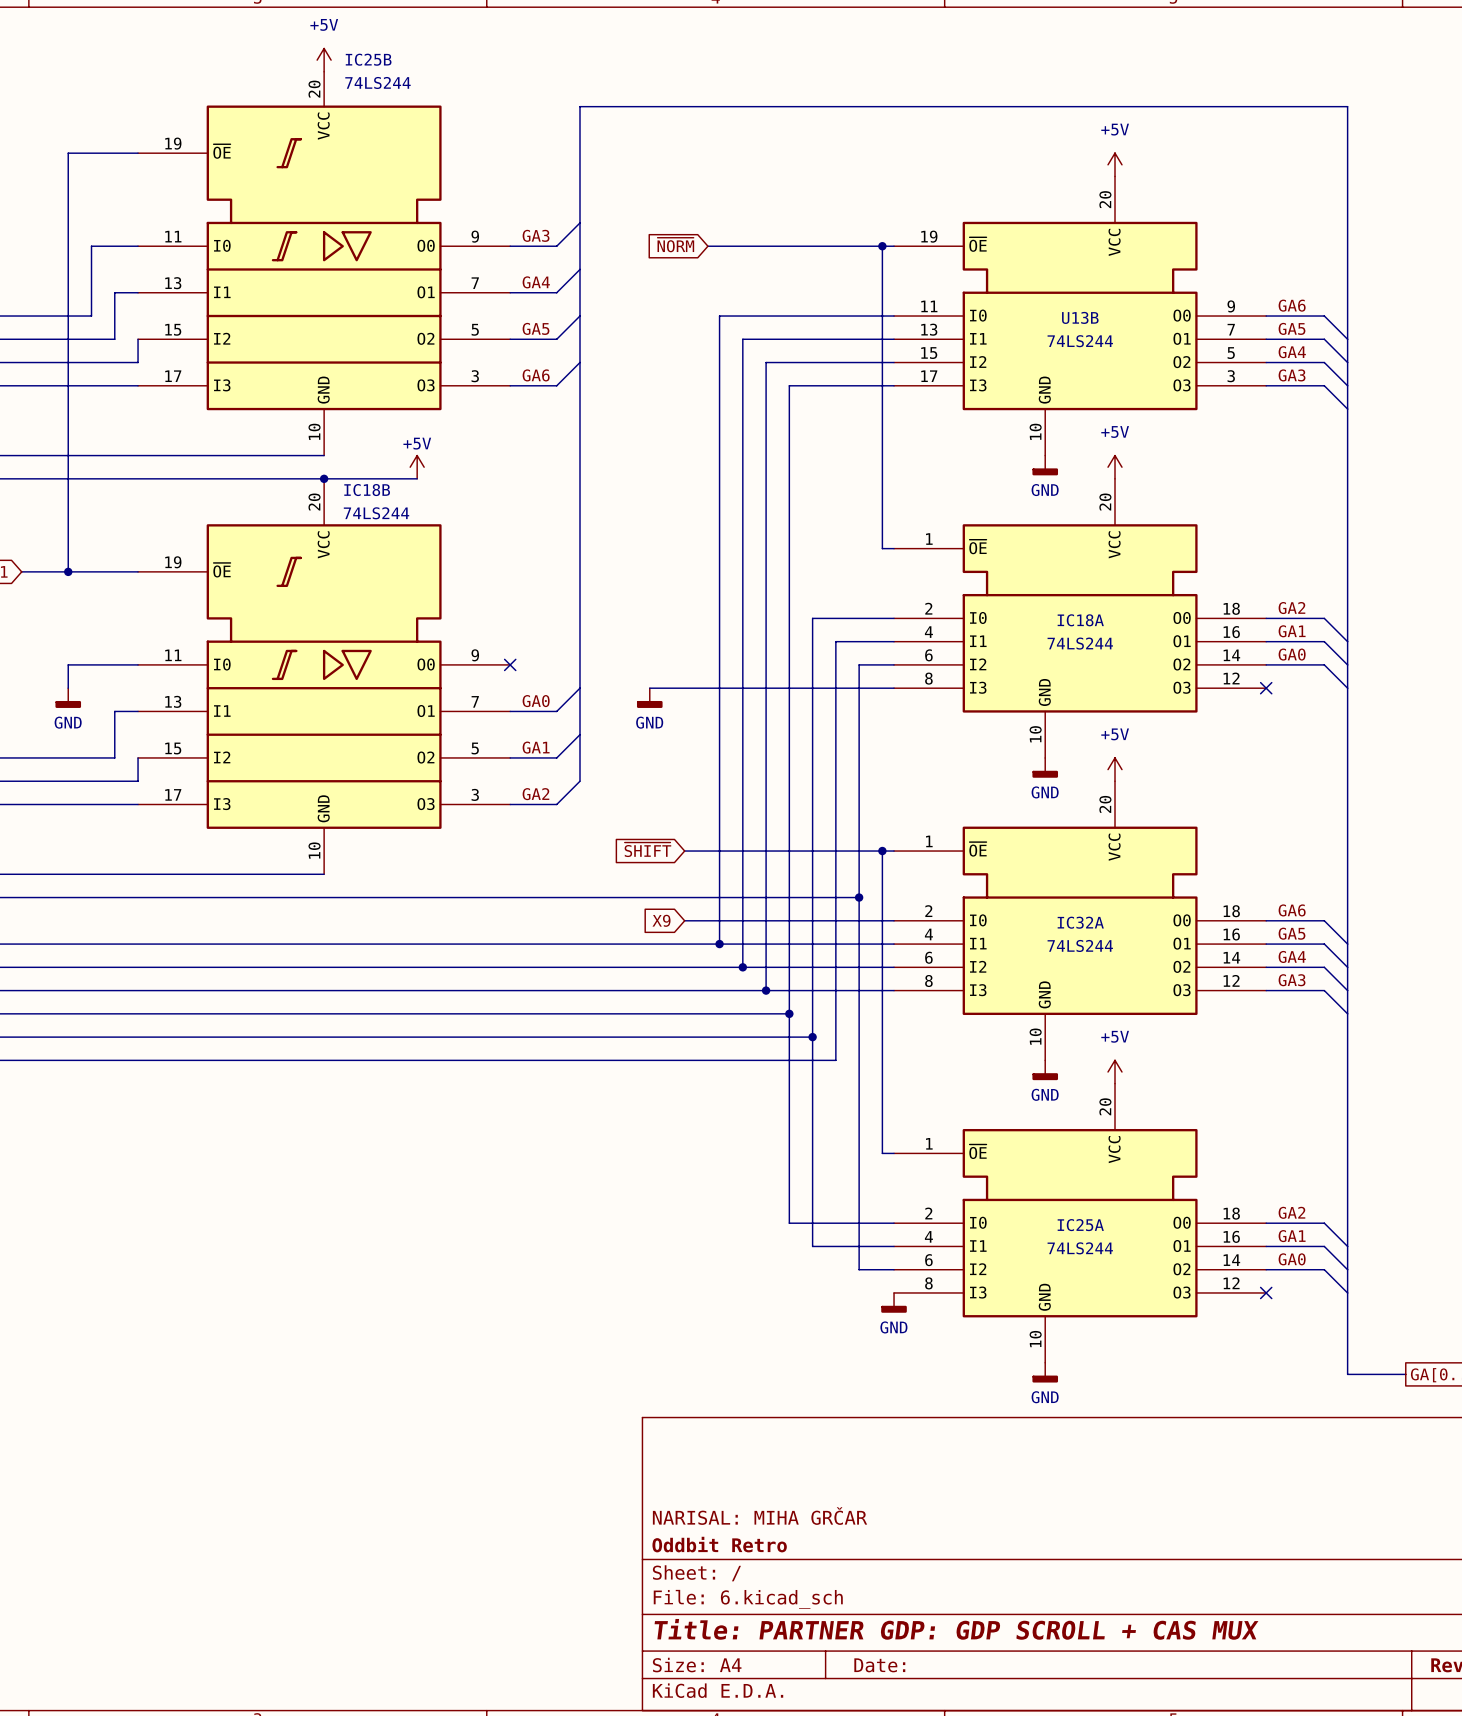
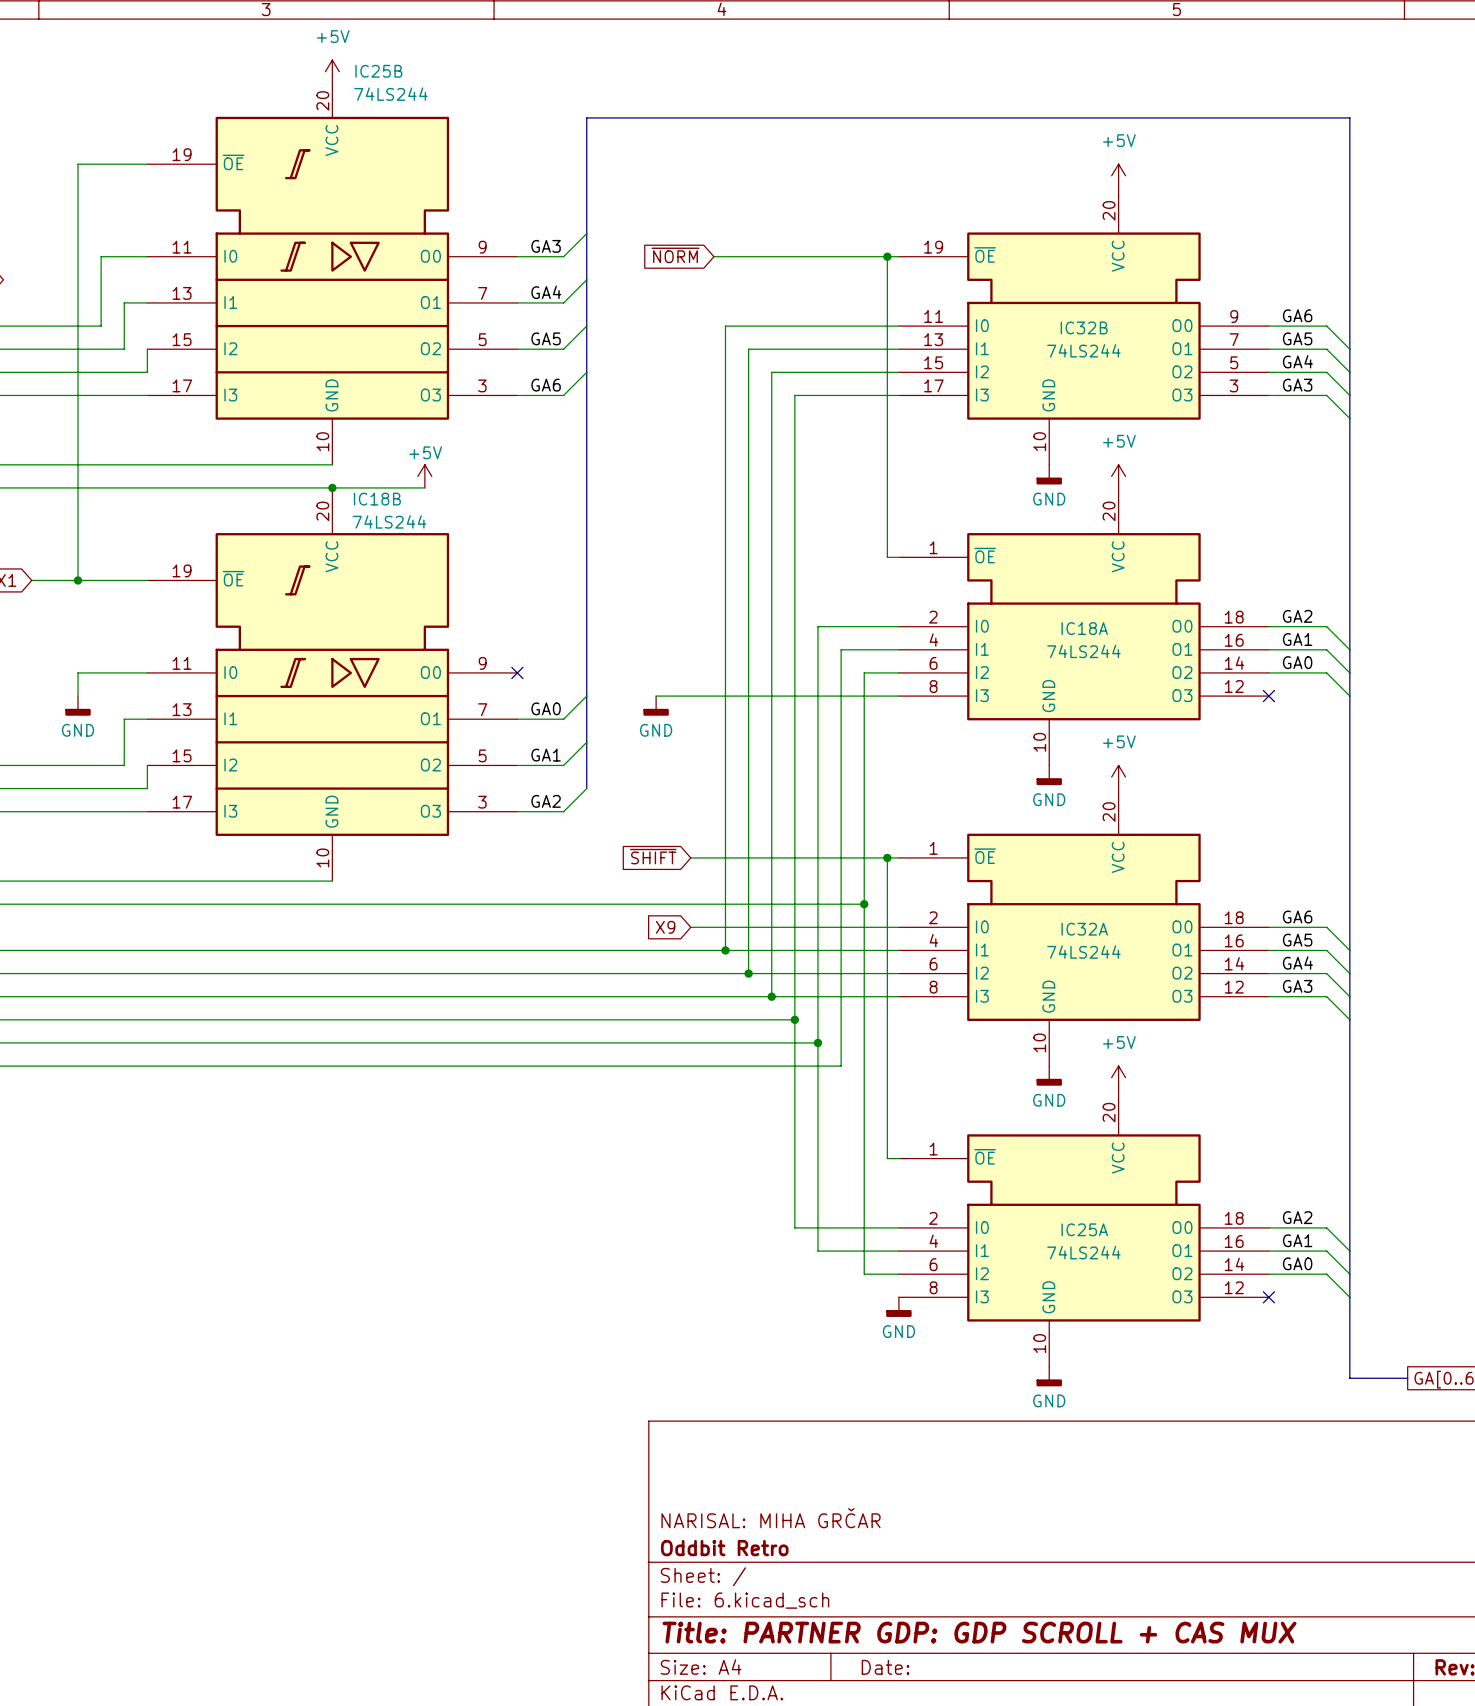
U13B name: U13B (1080, 317) -> IC32B (1084, 327)

